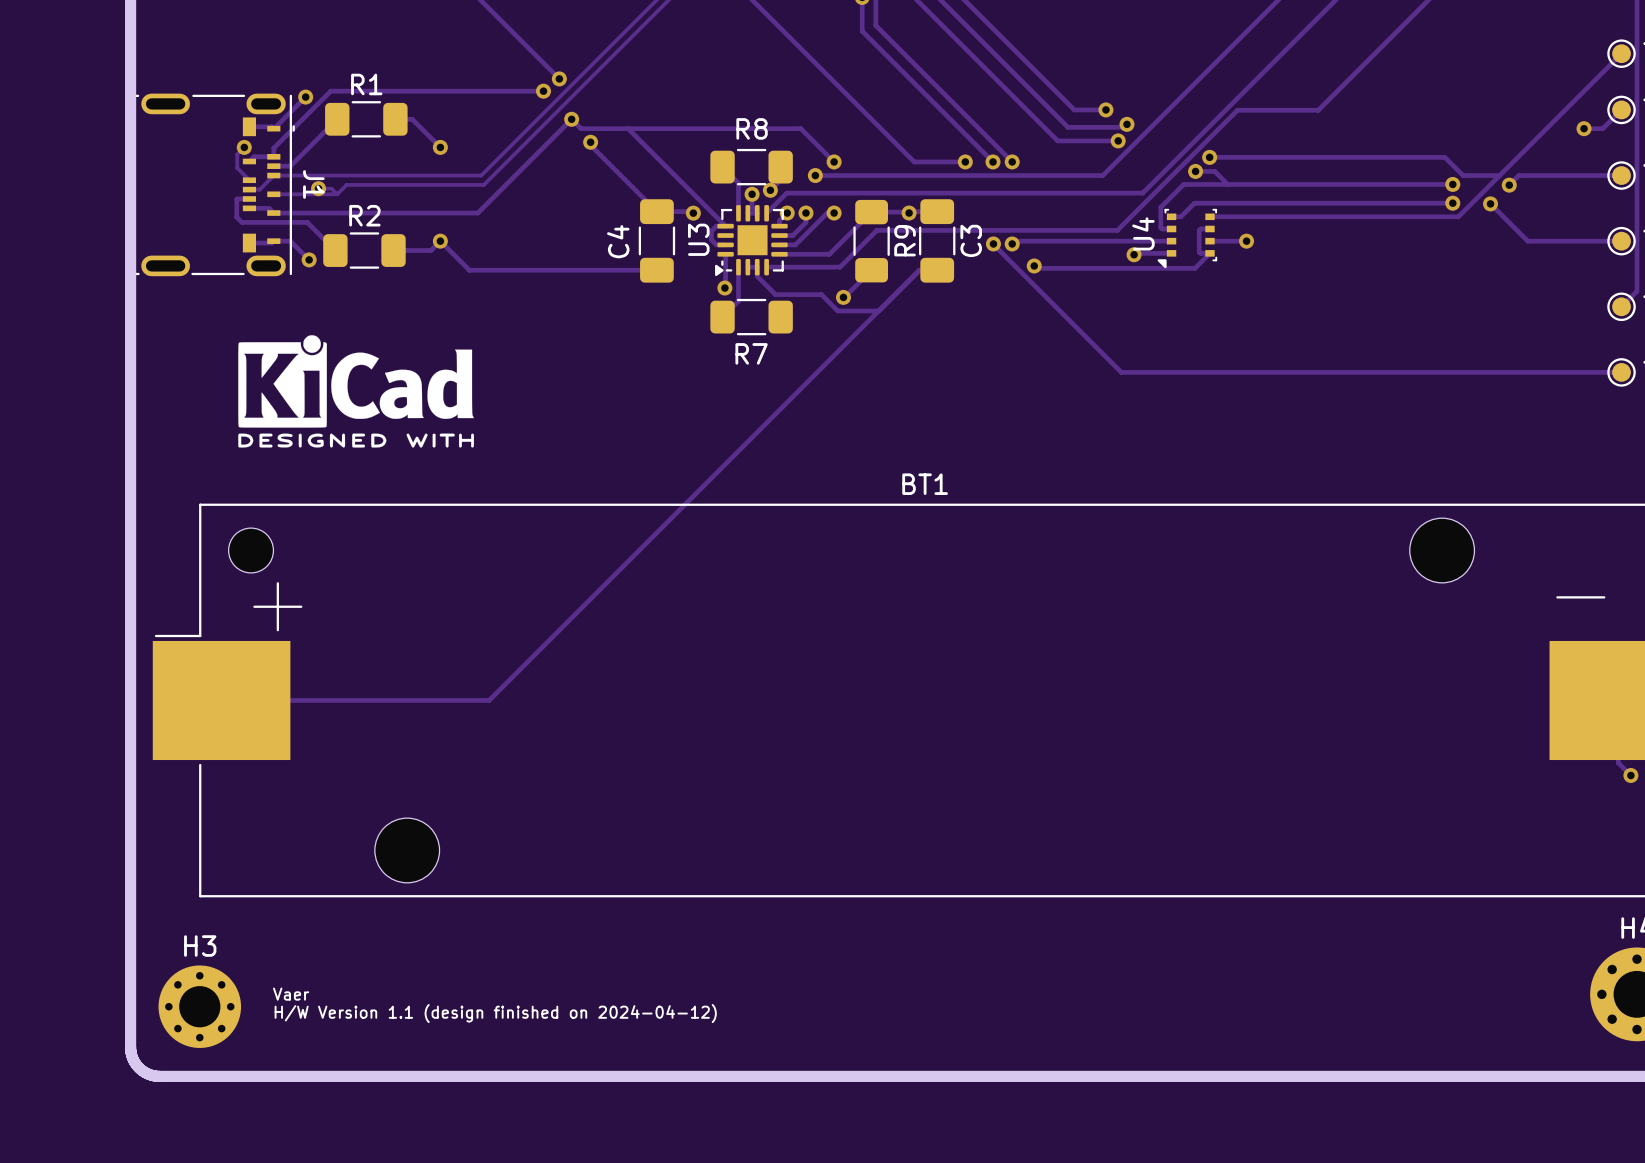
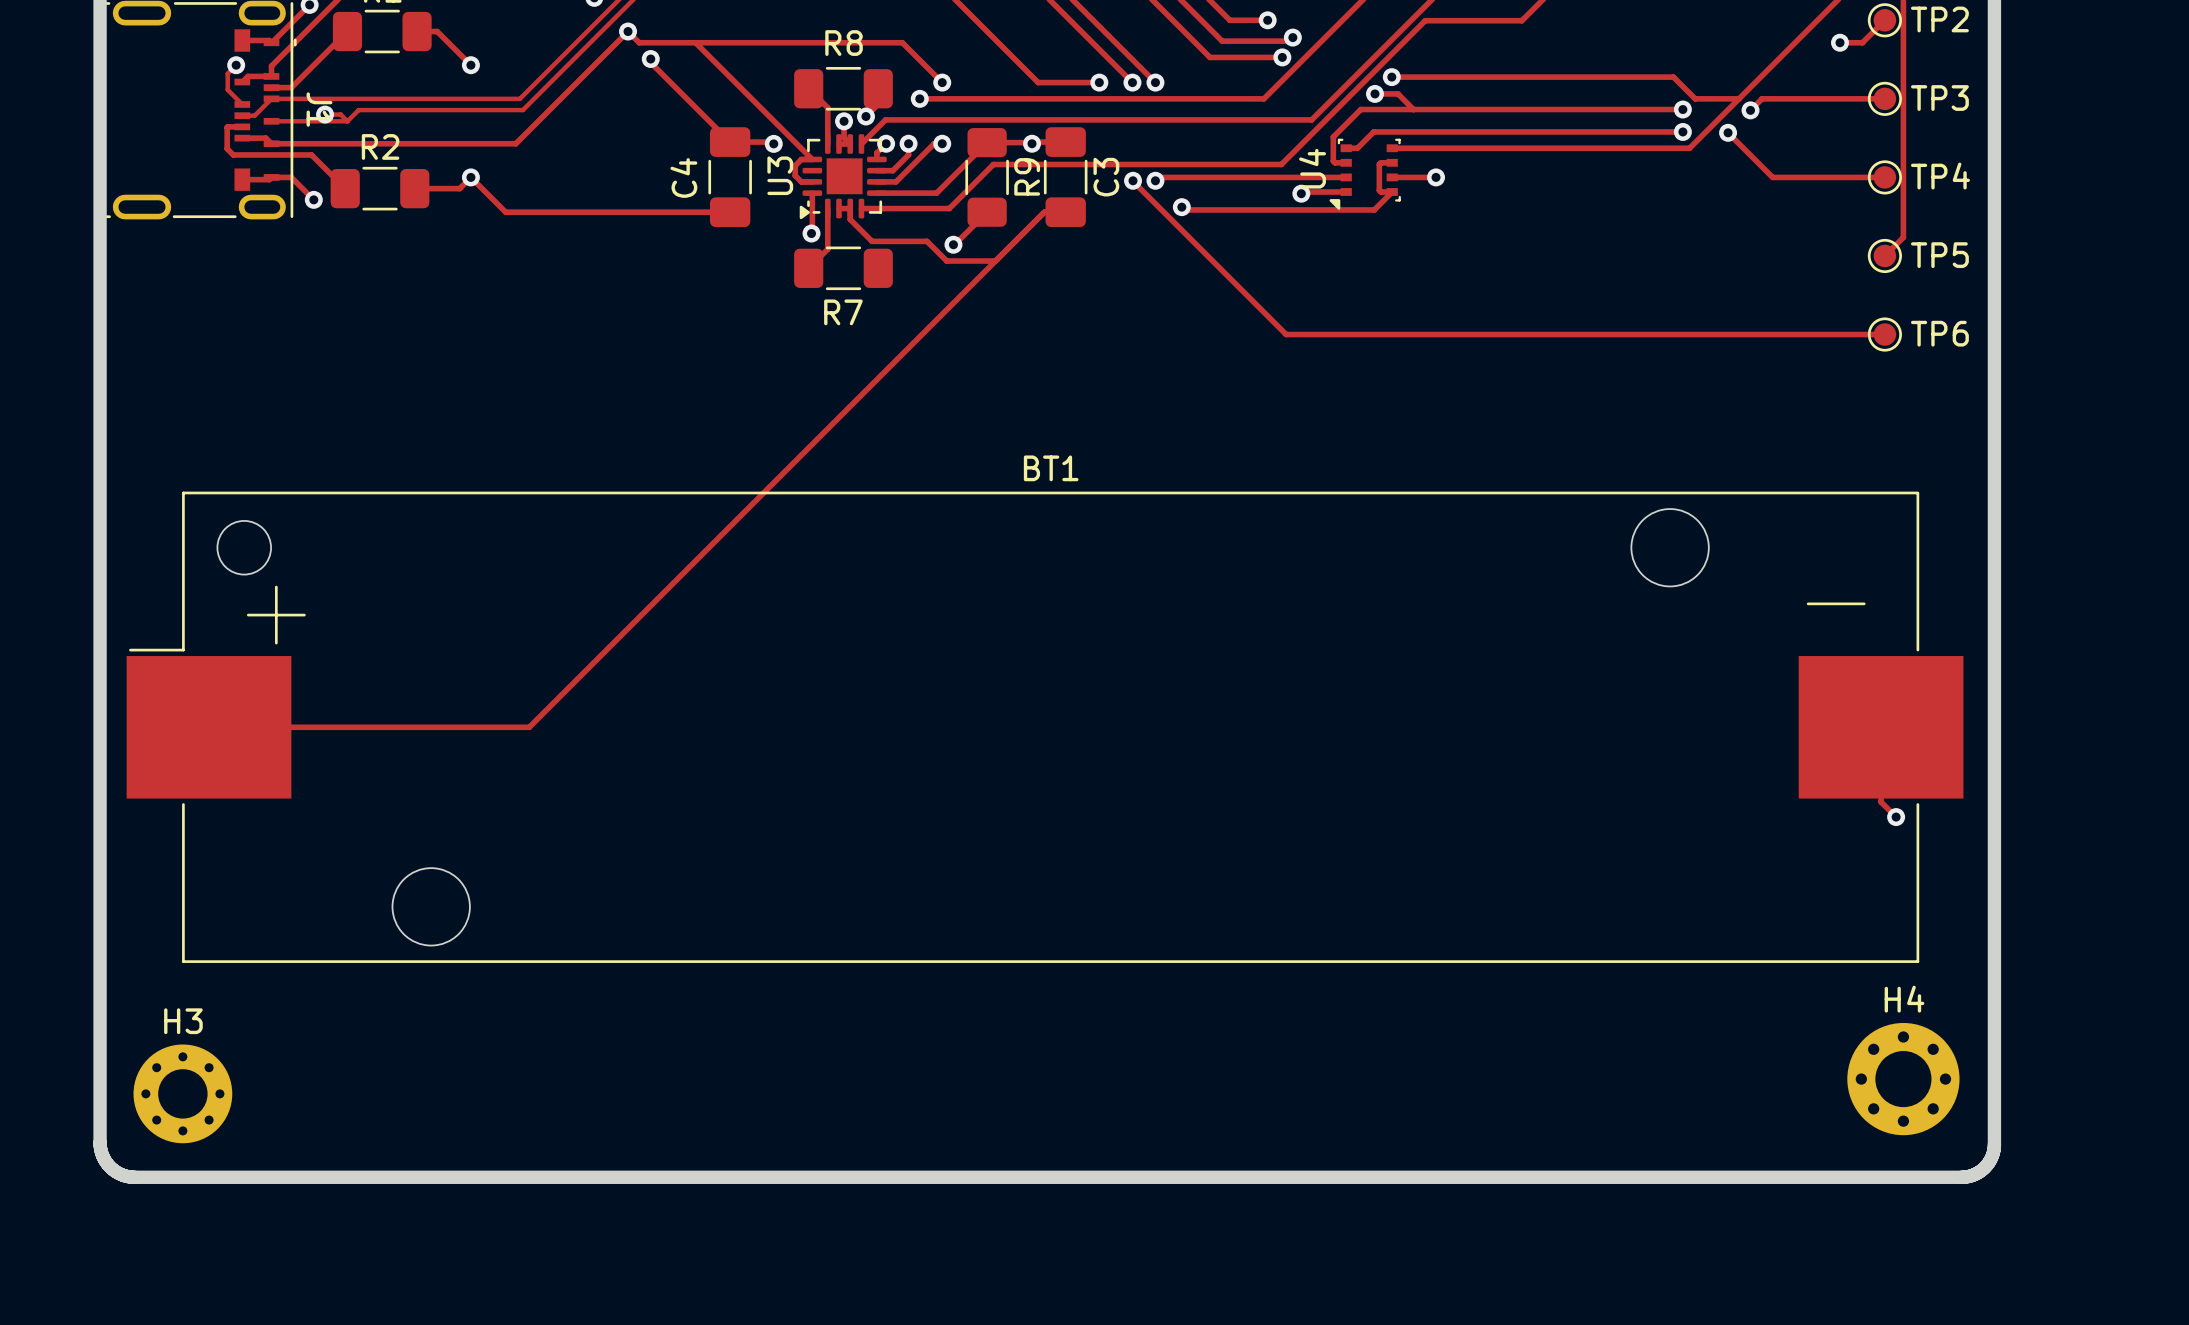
drawing: [238, 335, 475, 448] -> none
text: Vaer (291, 994) -> none
text: H/W Version 1.1 (design finished on 2024-04-12) (495, 1013) -> none

